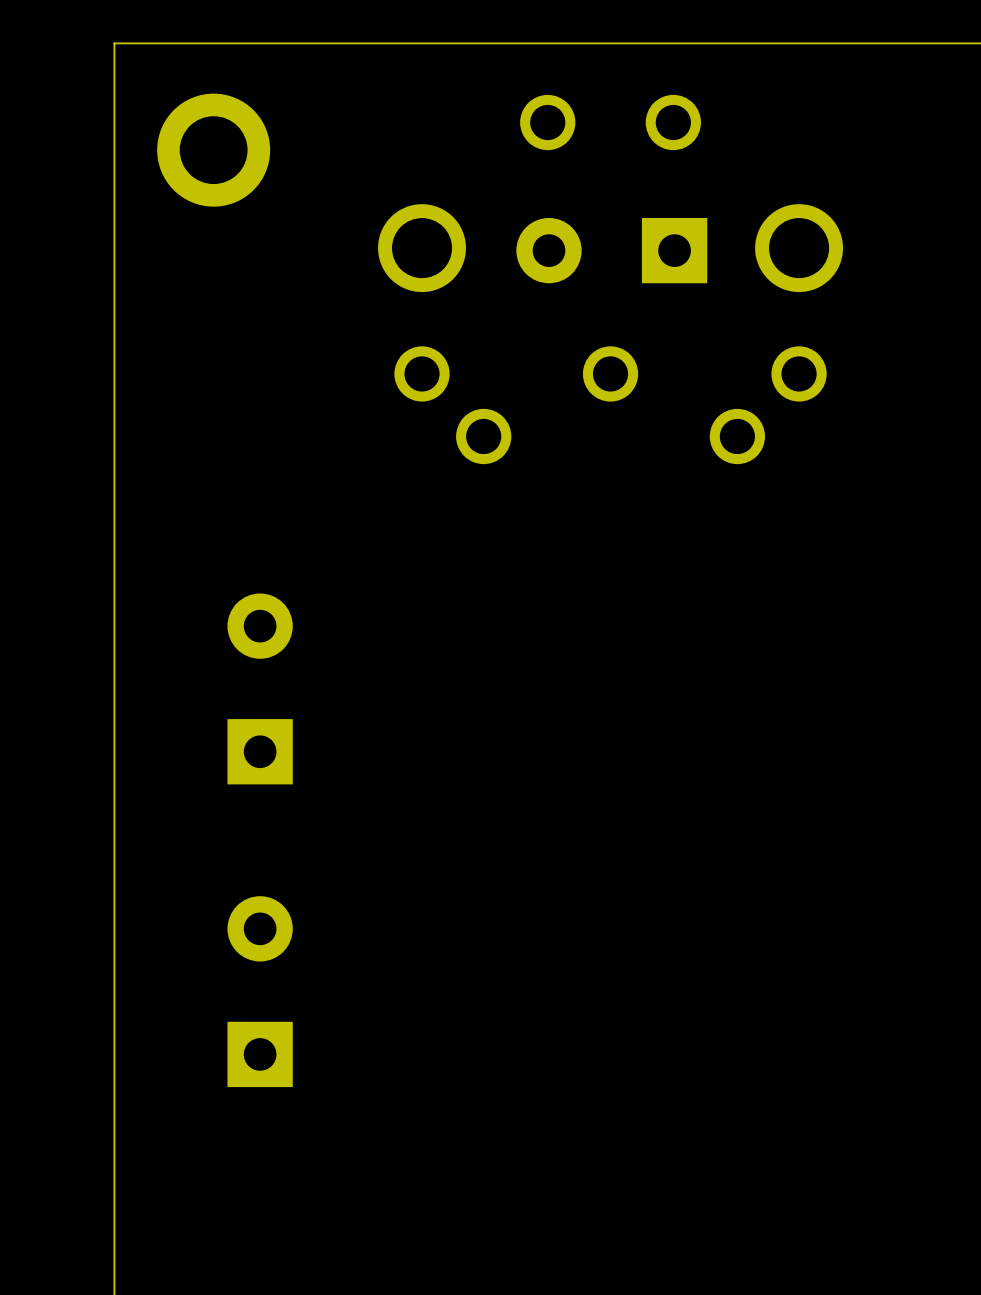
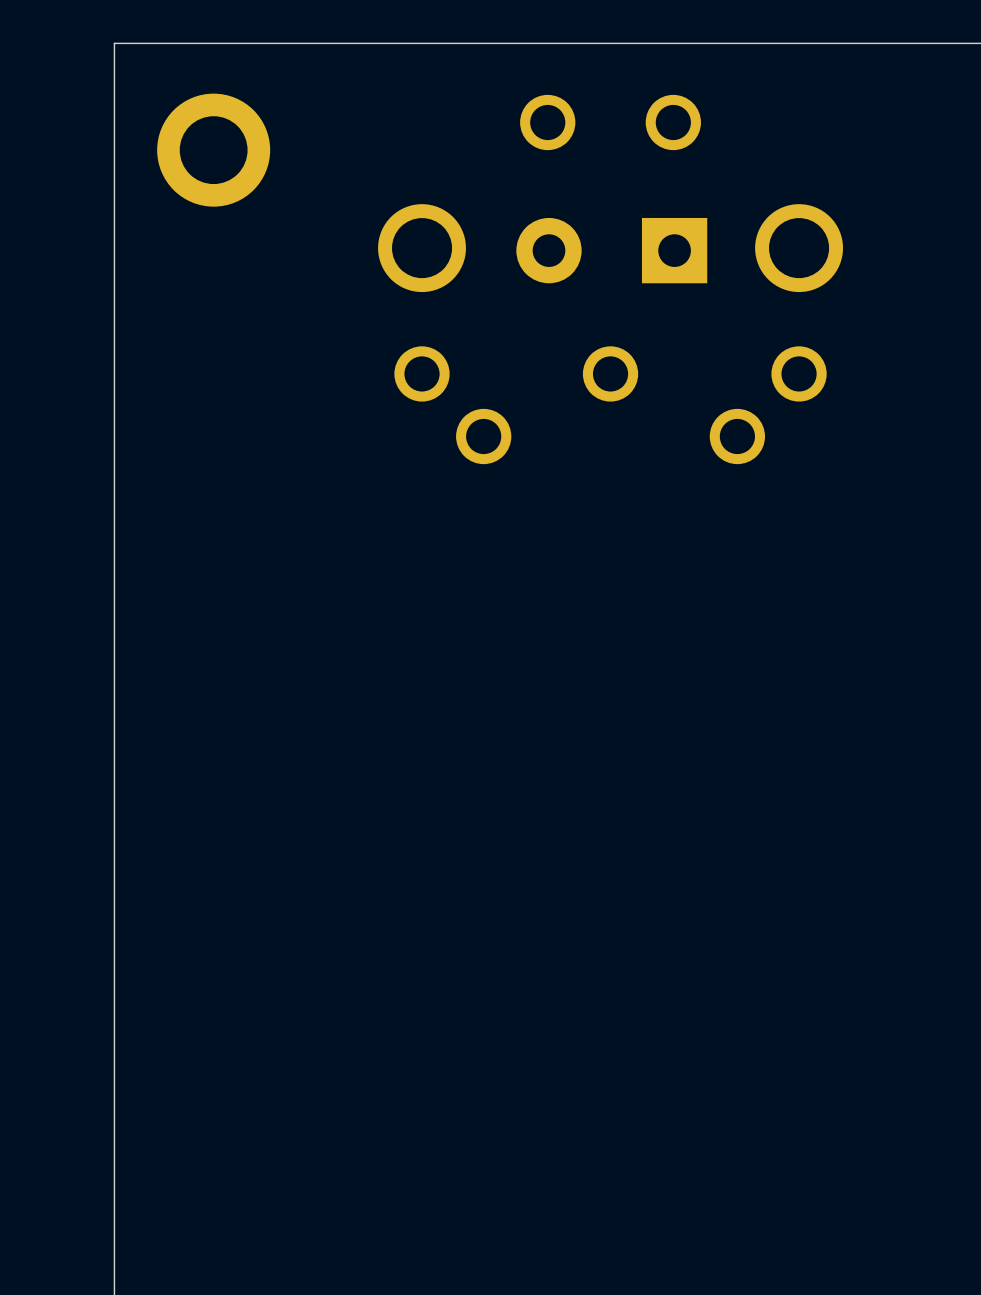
part: (260, 688) -> none
part: (260, 991) -> none

